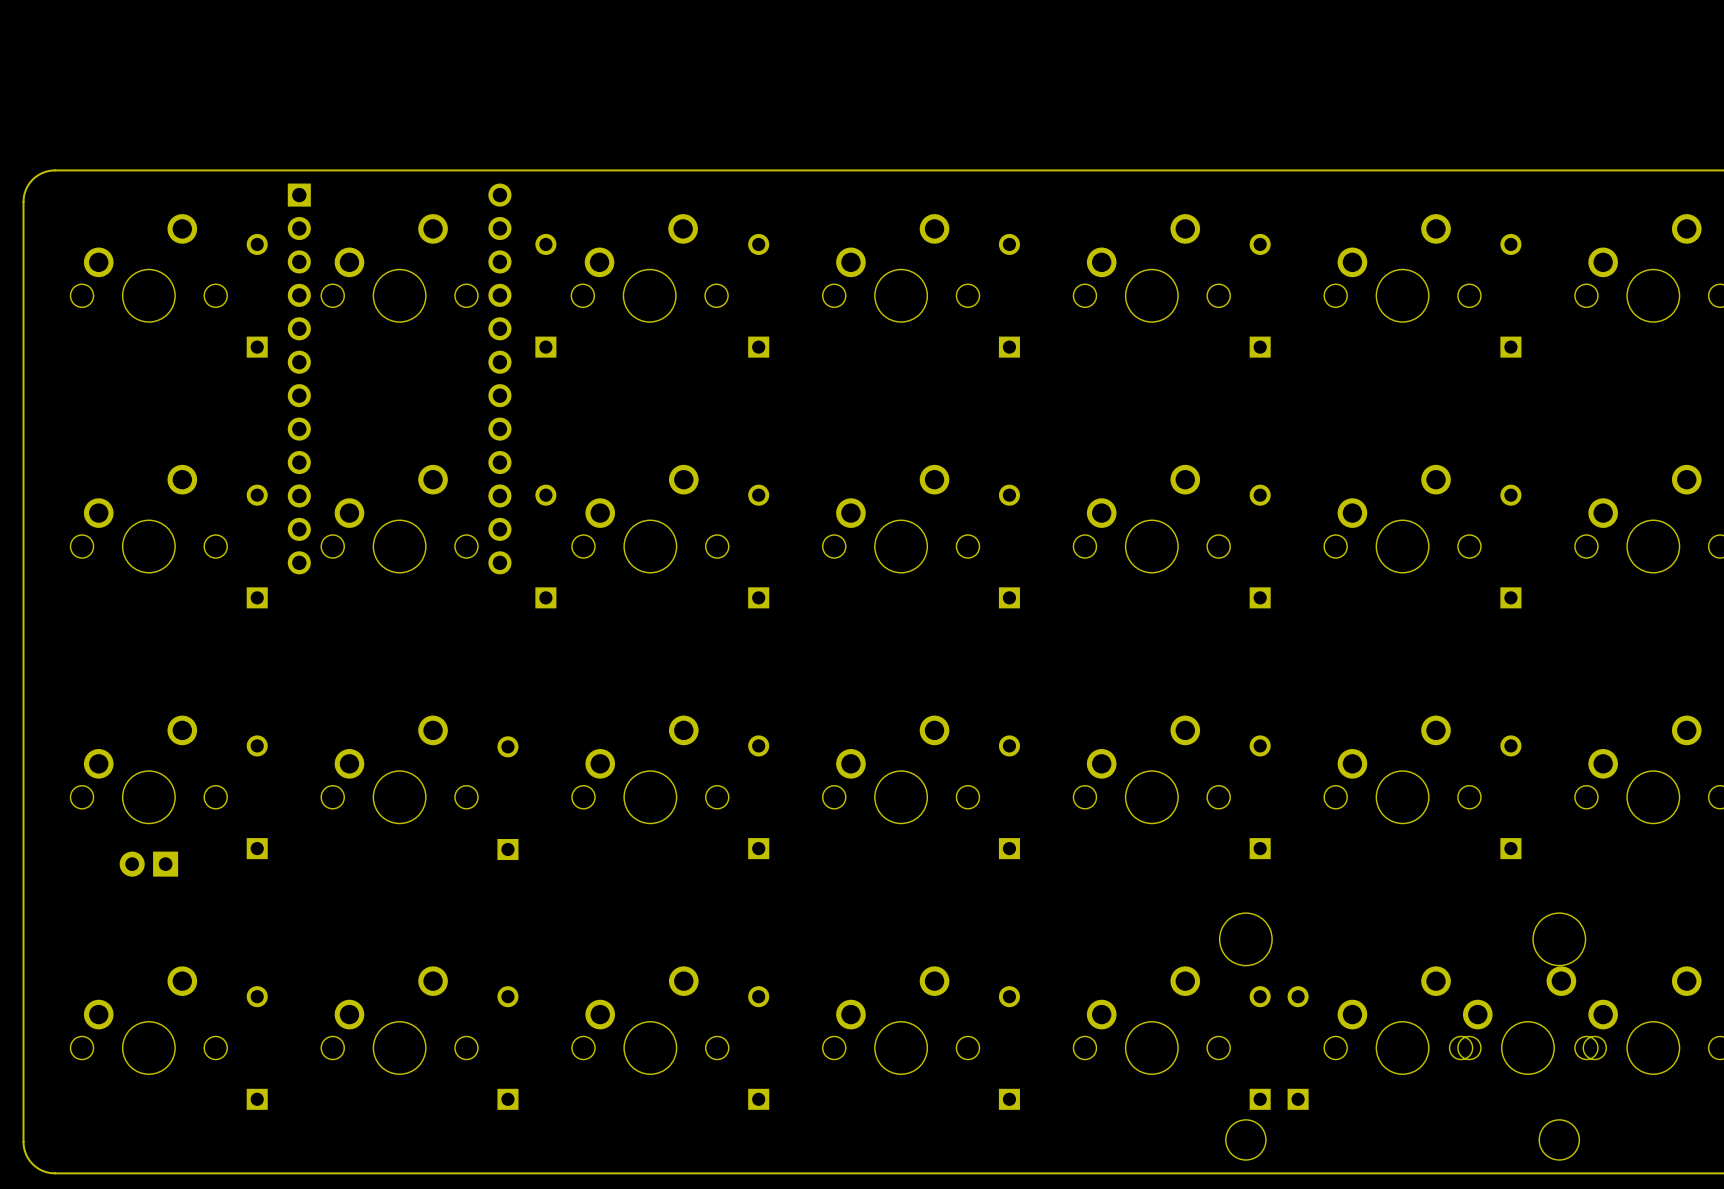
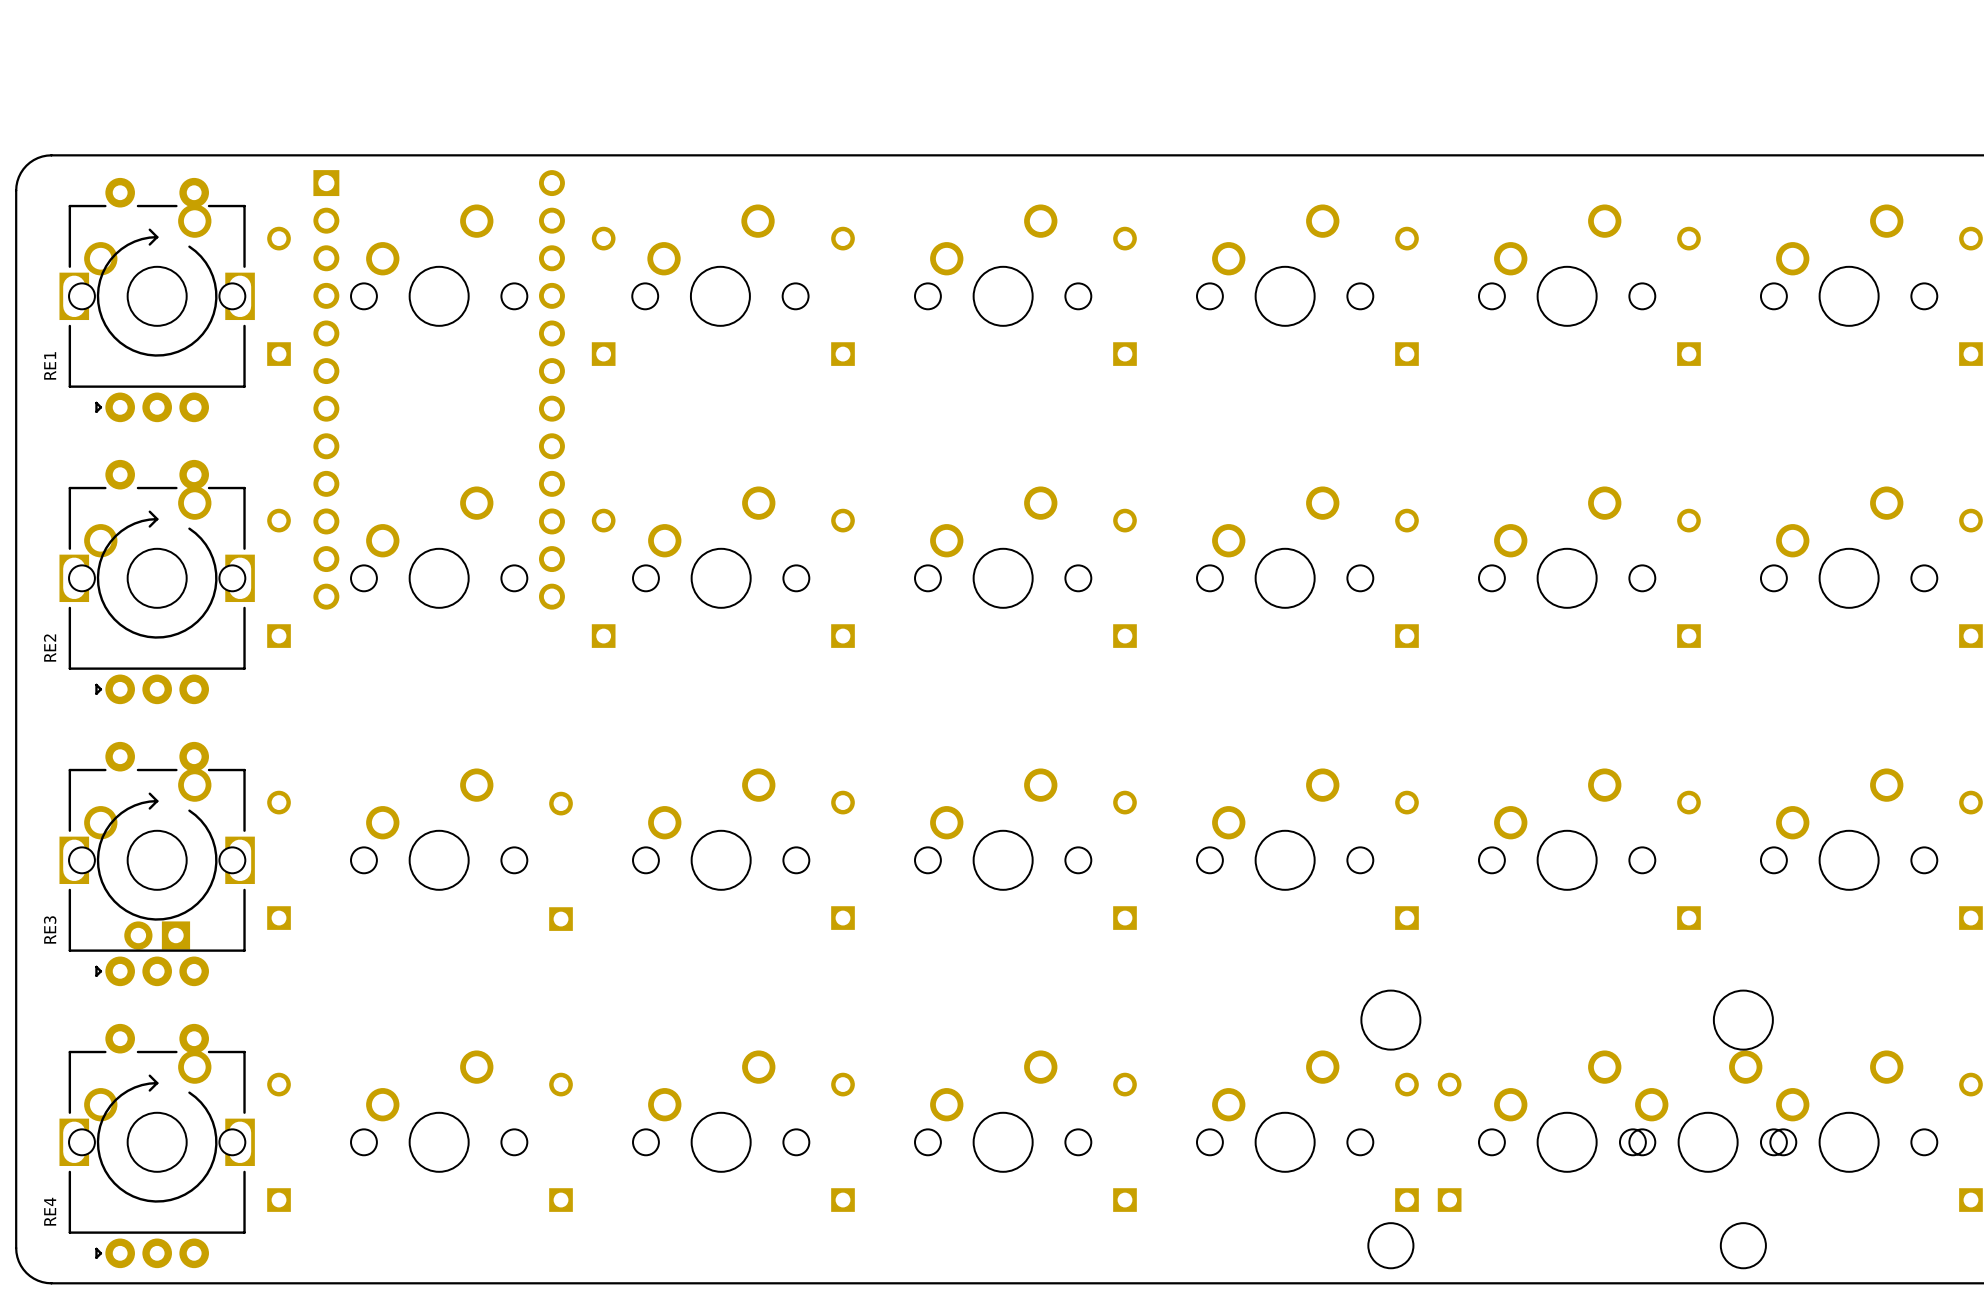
RE1: none -> (157, 300)
RE2: none -> (157, 582)
RE3: none -> (157, 864)
RE4: none -> (157, 1146)

